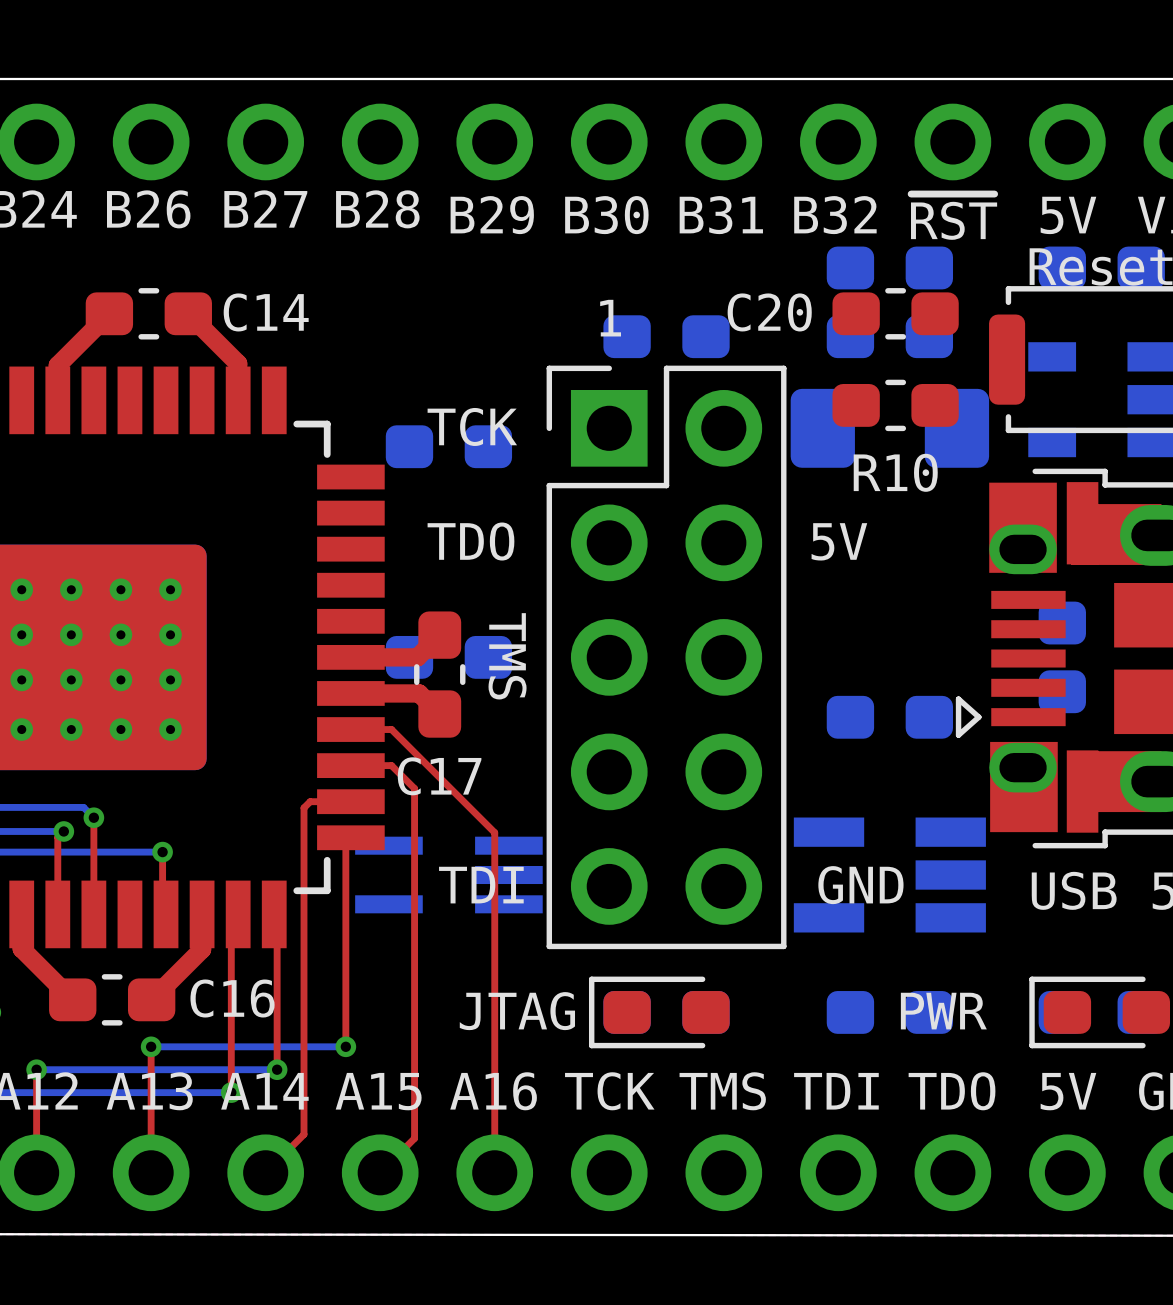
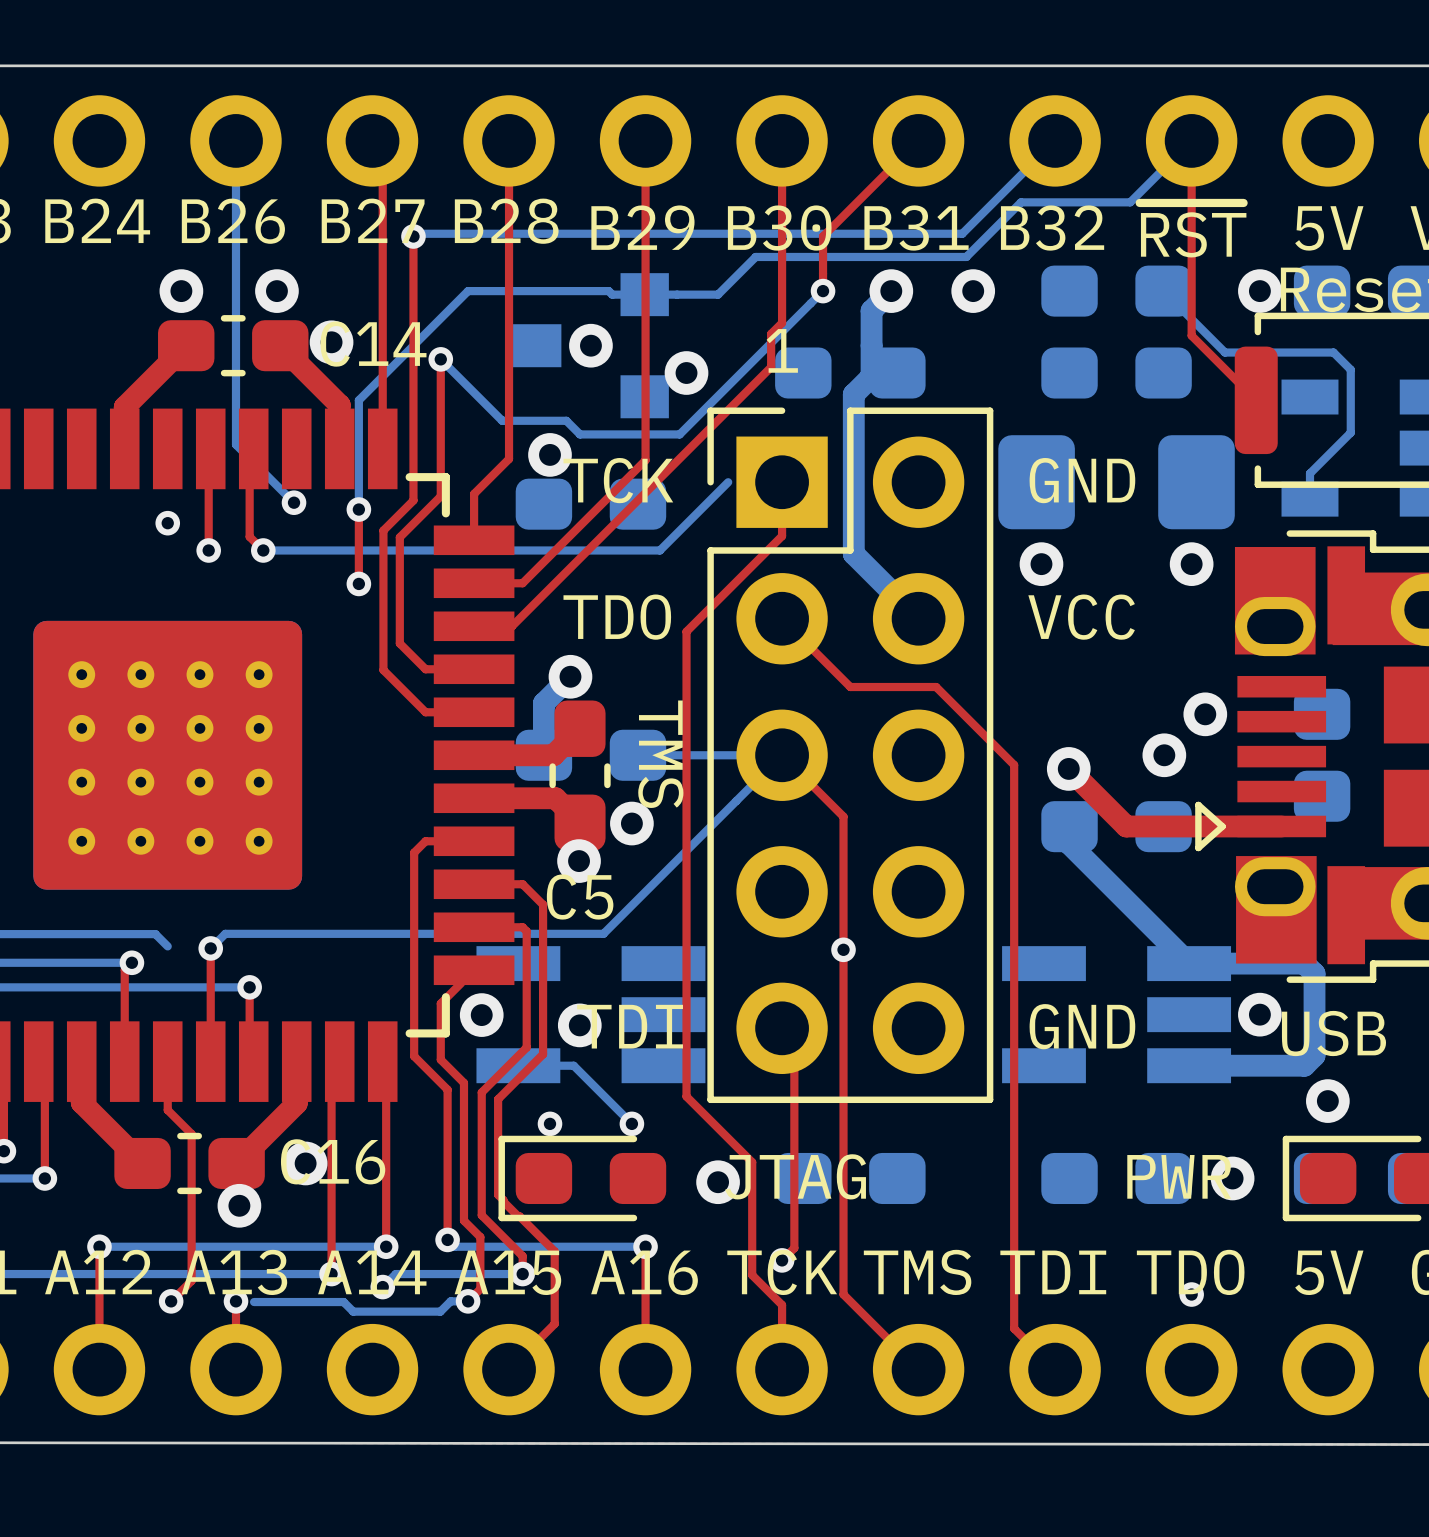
bottom track: none -> (235, 140) (235, 444) (294, 502)
top track: none -> (372, 140) (382, 151) (382, 448)
top track: none -> (509, 140) (509, 459) (474, 493) (474, 540)
top track: none -> (645, 140) (645, 460) (522, 583) (474, 583)
top track: none -> (782, 140) (782, 322) (771, 333) (771, 367) (512, 626) (474, 626)
top track: none -> (918, 140) (823, 236) (823, 291)
bottom track: none -> (1055, 140) (962, 233) (416, 233) (413, 236)
bottom track: none -> (1191, 140) (1130, 202) (1020, 202) (966, 256) (755, 256) (718, 294) (612, 294) (608, 291) (468, 291) (358, 400) (358, 509)
top track: none -> (1191, 140) (1191, 335) (1256, 400)
top track: none -> (413, 236) (413, 500) (383, 530) (383, 670) (425, 712) (474, 712)
via: none -> (413, 236)
via: none -> (181, 291)
via: none -> (276, 291)
bottom track: none -> (823, 291) (679, 434) (580, 434) (566, 420) (502, 420) (440, 359)
via: none -> (823, 291)
bottom track: none -> (891, 291) (871, 310) (871, 376) (853, 394) (853, 553) (918, 618)
via: none -> (891, 291)
via: none -> (973, 291)
bottom track: none -> (1163, 291) (1225, 352) (1333, 352) (1350, 369) (1350, 432) (1310, 473) (1310, 499)
via: none -> (1259, 291)
via: none -> (331, 342)
part: none -> (590, 345)
via: none -> (590, 345)
C20: (895, 313) -> none
top track: none -> (440, 359) (440, 496) (399, 537) (399, 643) (425, 669) (474, 669)
via: none -> (440, 359)
via: none -> (686, 373)
top track: none -> (208, 450) (208, 550)
top track: none -> (249, 452) (249, 536) (263, 550)
via: none -> (549, 454)
R10: (895, 405) -> none
text: none -> GND (1082, 480)
bottom track: none -> (728, 482) (659, 550) (263, 550)
top track: none -> (782, 482) (782, 536) (686, 631) (686, 1096) (752, 1162) (752, 1275) (782, 1305) (782, 1369)
via: none -> (294, 502)
top track: none -> (358, 509) (358, 583)
via: none -> (358, 509)
via: none -> (167, 523)
via: none -> (208, 550)
via: none -> (263, 550)
via: none -> (1041, 564)
via: none -> (1191, 564)
via: none -> (358, 583)
text: 5V (839, 541) -> VCC (1081, 617)
top track: none -> (782, 618) (850, 687) (936, 687) (1014, 765) (1014, 1328) (1055, 1369)
bottom track: none -> (570, 676) (543, 703) (543, 755)
via: none -> (570, 676)
via: none -> (1205, 714)
bottom track: none -> (637, 755) (782, 755) (603, 933) (225, 933) (210, 948) (212, 949)
top track: none -> (782, 755) (843, 816) (843, 1294) (918, 1369)
via: none -> (1164, 755)
top track: none -> (1068, 768) (1126, 826) (1281, 826)
via: none -> (1068, 768)
via: none -> (631, 823)
bottom track: none -> (1069, 826) (1069, 844) (1189, 963) (1304, 963) (1314, 973) (1314, 1055) (1304, 1065) (1189, 1065)
top track: (350, 729) (391, 729) (494, 832) (494, 1069) -> (474, 841) (425, 841) (414, 852) (414, 1056) (447, 1089) (447, 1239)
via: none -> (579, 861)
C17 name: C17 (439, 776) -> C5 (580, 896)
top track: (408, 782) (414, 788) (414, 1138) -> (543, 904) (543, 1054) (498, 1099) (498, 1194) (554, 1251) (554, 1323) (549, 1328)
top track: (350, 801) (310, 801) (304, 807) (304, 1134) (265, 1172) -> (474, 927) (522, 927) (526, 931) (526, 1047) (481, 1092) (481, 1215) (522, 1256) (522, 1274)
top track: (93, 817) (93, 914) -> (171, 1301) (191, 1280) (191, 1134) (167, 1110) (167, 1061)
via position: (93, 817) -> (210, 948)
top track: none -> (210, 948) (210, 1061)
via: none -> (843, 949)
part footprint: [355, 836, 543, 914] -> [476, 946, 706, 1084]
top track: (350, 837) (345, 842) (345, 1046) -> none
top track: none -> (461, 983) (440, 1003) (440, 1059) (463, 1082) (463, 1220) (480, 1237) (480, 1289) (468, 1301)
via: none -> (481, 1015)
via: none -> (1259, 1014)
via: none -> (579, 1025)
top track: none -> (794, 1040) (794, 1248) (782, 1260)
bottom track: none -> (518, 1065) (573, 1065) (631, 1123)
via: none -> (1327, 1101)
via: none -> (549, 1123)
via: none -> (631, 1123)
via: none -> (305, 1163)
text position: JTAG (517, 1011) -> JTAG (795, 1176)
part position: (659, 1012) -> (582, 1178)
via: none -> (1232, 1178)
via: none -> (718, 1182)
via size: [140, 1036, 162, 1058] -> [217, 1183, 262, 1228]
bottom track: (151, 1046) (345, 1046) -> none
top track: (151, 1046) (151, 1115) -> none
via position: (345, 1046) -> (447, 1239)
bottom track: none -> (447, 1239) (454, 1246) (645, 1246)
via: none -> (645, 1246)
via: none -> (782, 1260)
bottom track: none -> (522, 1274) (395, 1274) (382, 1287)
via: none -> (522, 1274)
via: none -> (382, 1287)
via: none -> (1191, 1294)
via: none -> (171, 1301)
via: none -> (235, 1301)
bottom track: none -> (468, 1301) (450, 1301) (440, 1311) (353, 1311) (343, 1302) (254, 1302)
via: none -> (468, 1301)

